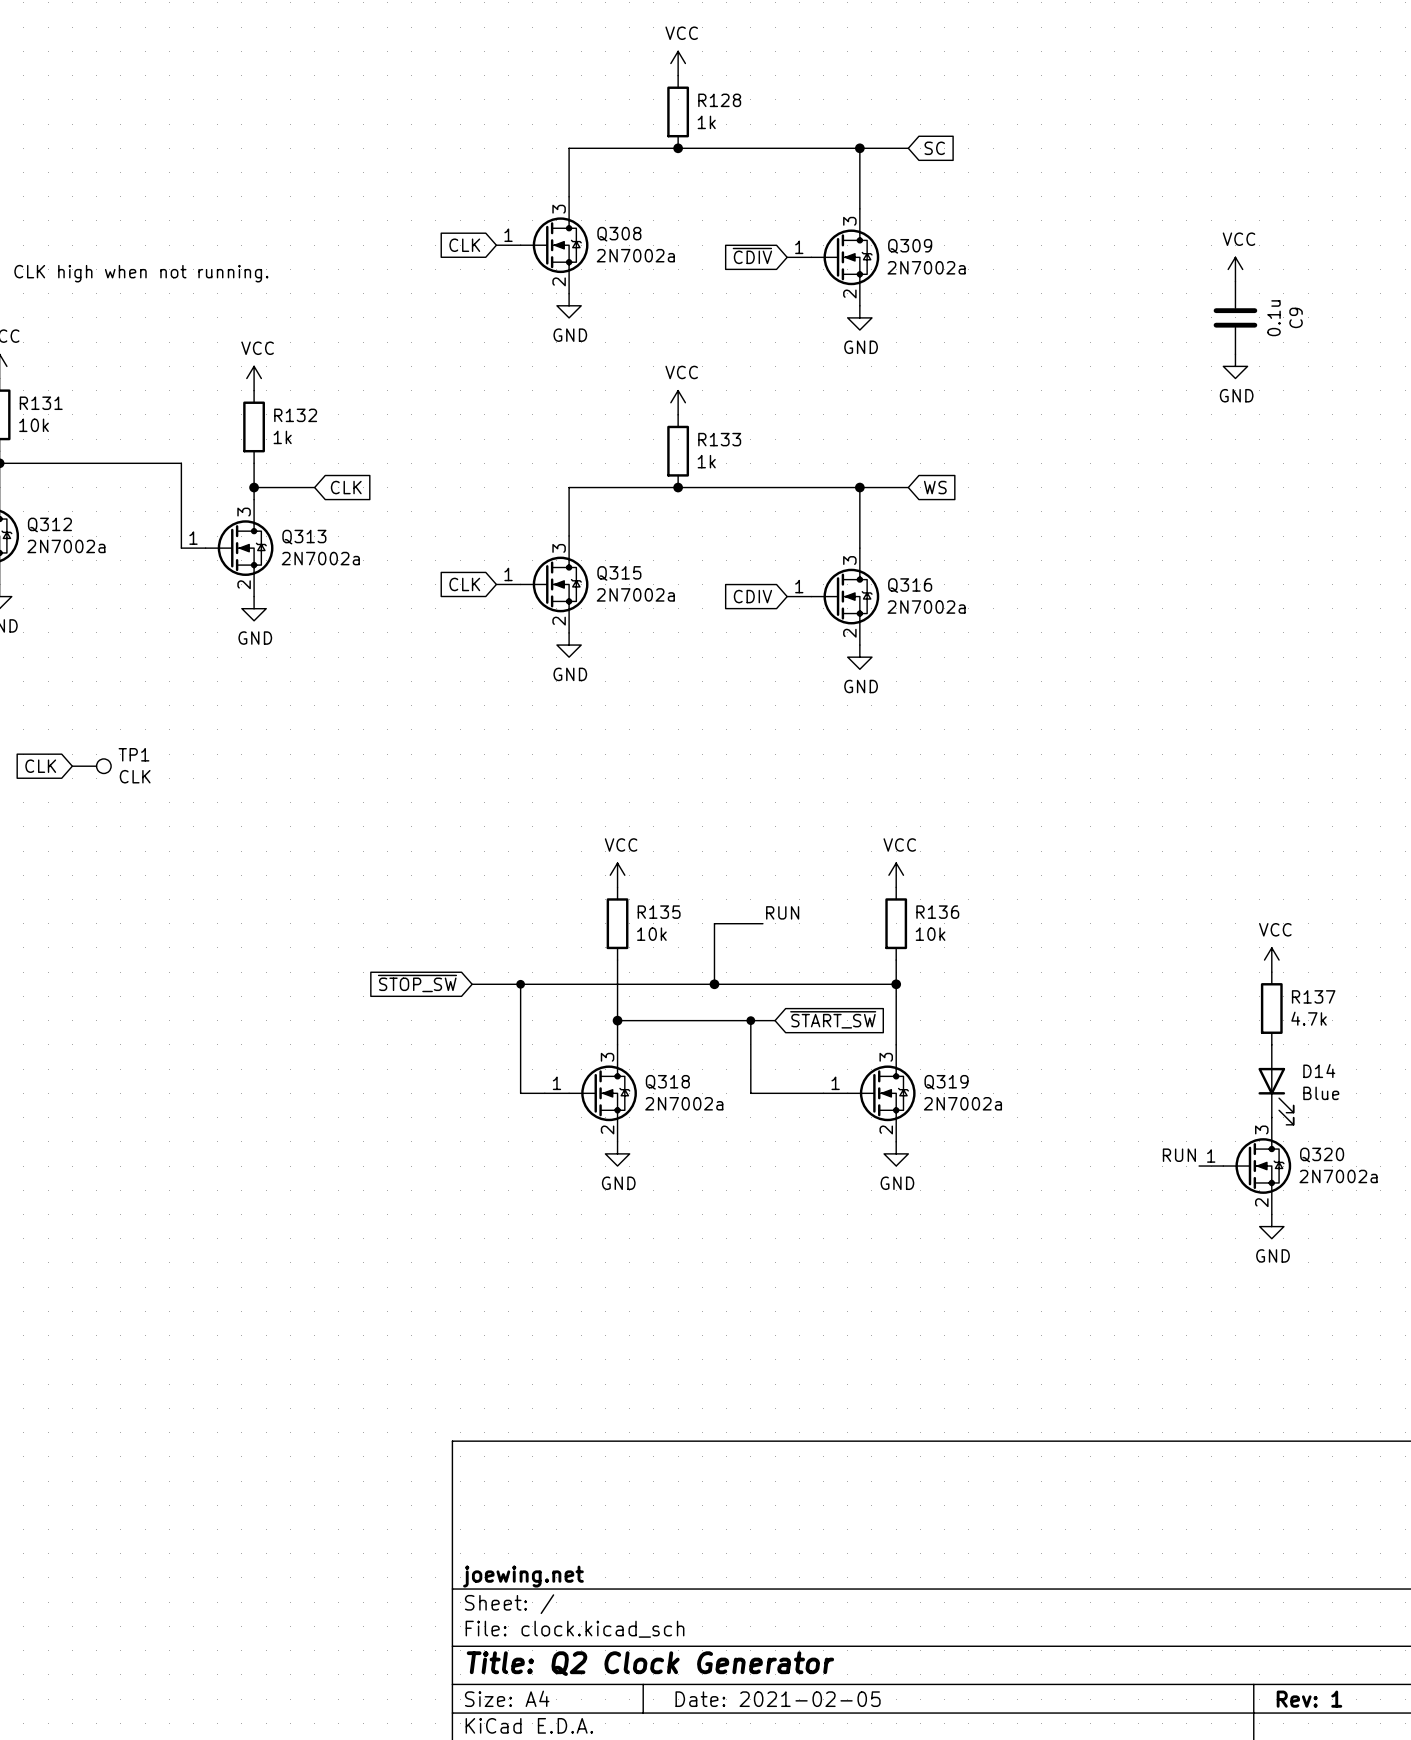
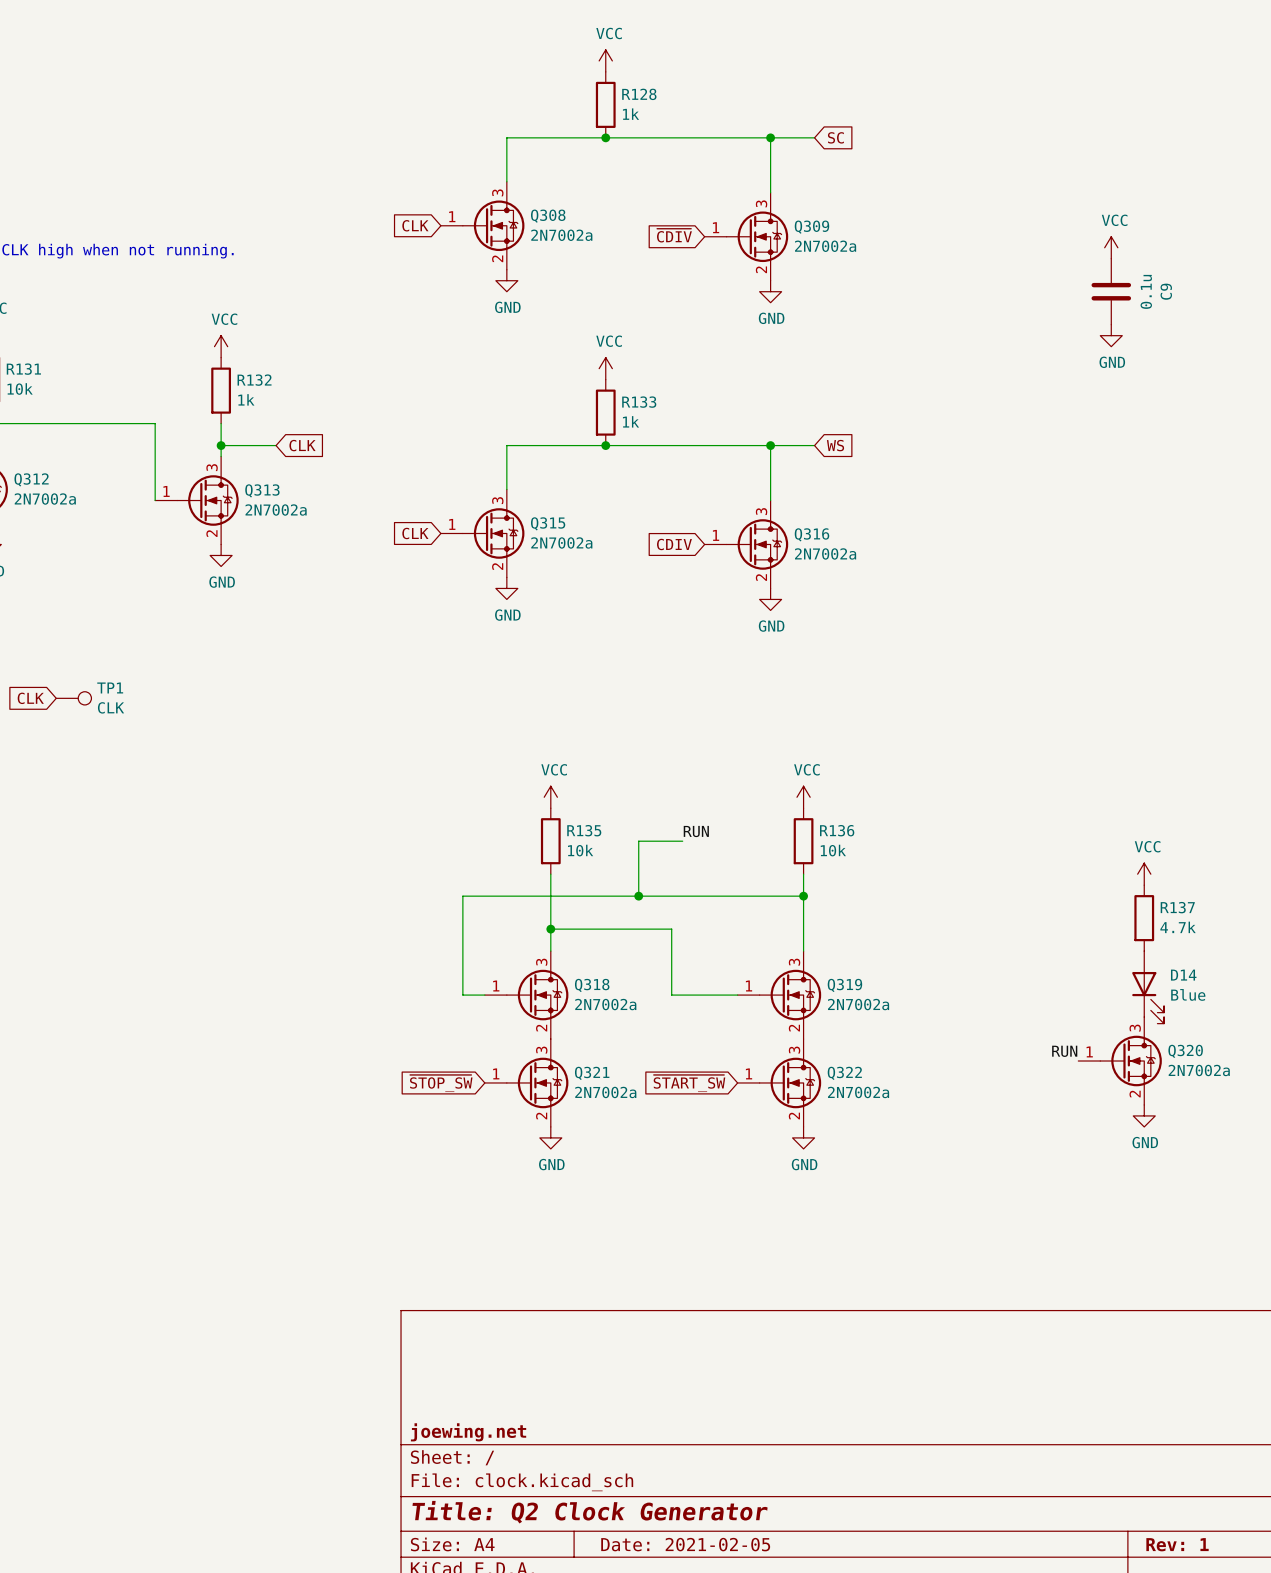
global label position: ~{STOP_SW} (417, 983) -> ~{STOP_SW} (441, 1083)
wire: (472, 984) (520, 984) -> none
junction: (520, 984) -> none
global label rotation: 0° (833, 1019) -> 180° (689, 1083)
global label position: ~{START_SW} (833, 1019) -> ~{START_SW} (689, 1083)
wire: (750, 1020) (775, 1020) -> none
junction: (750, 1020) -> none
power symbol position: GND (617, 1153) -> GND (550, 1137)
power symbol position: GND (896, 1153) -> GND (803, 1137)
Q321: none -> 2N7002a (526, 1082)
Q322: none -> 2N7002a (779, 1082)

